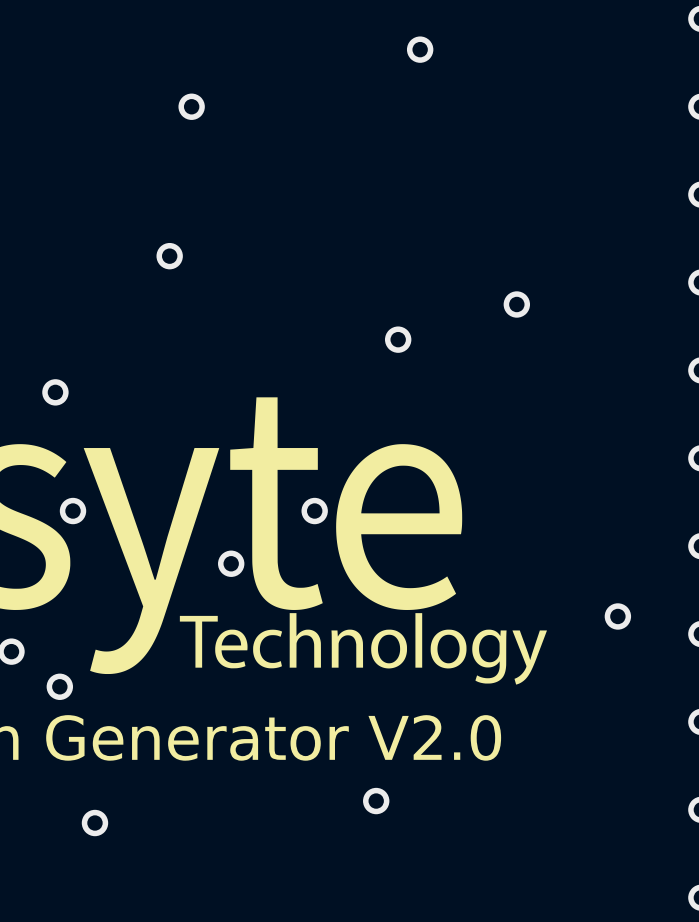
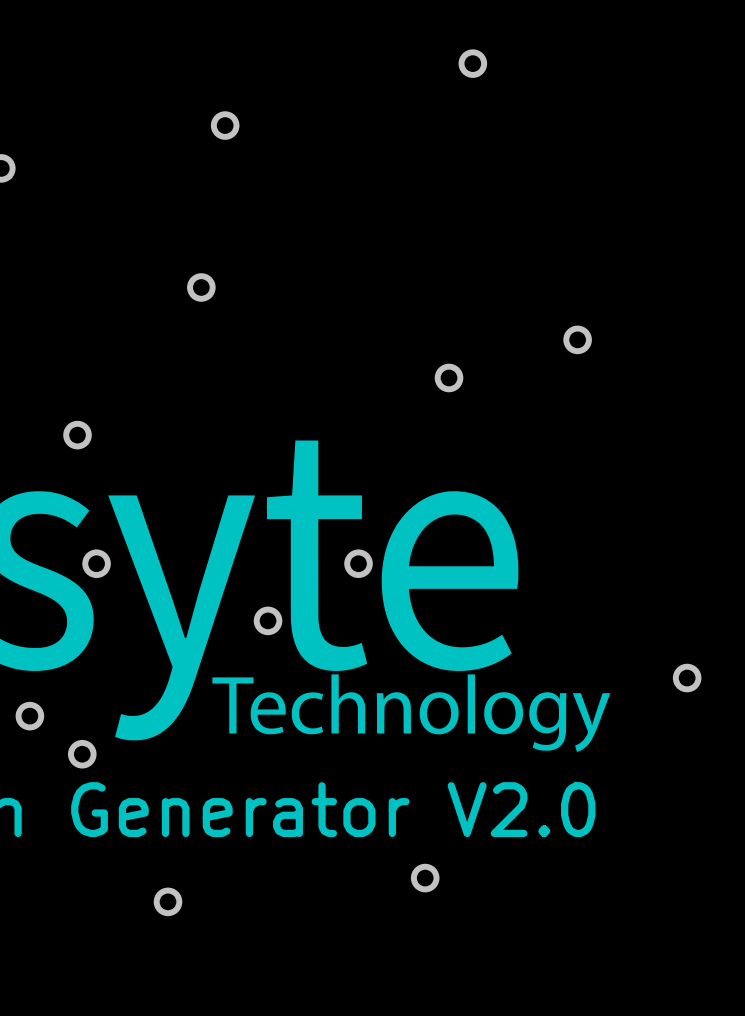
via position: (94, 823) -> (168, 901)

